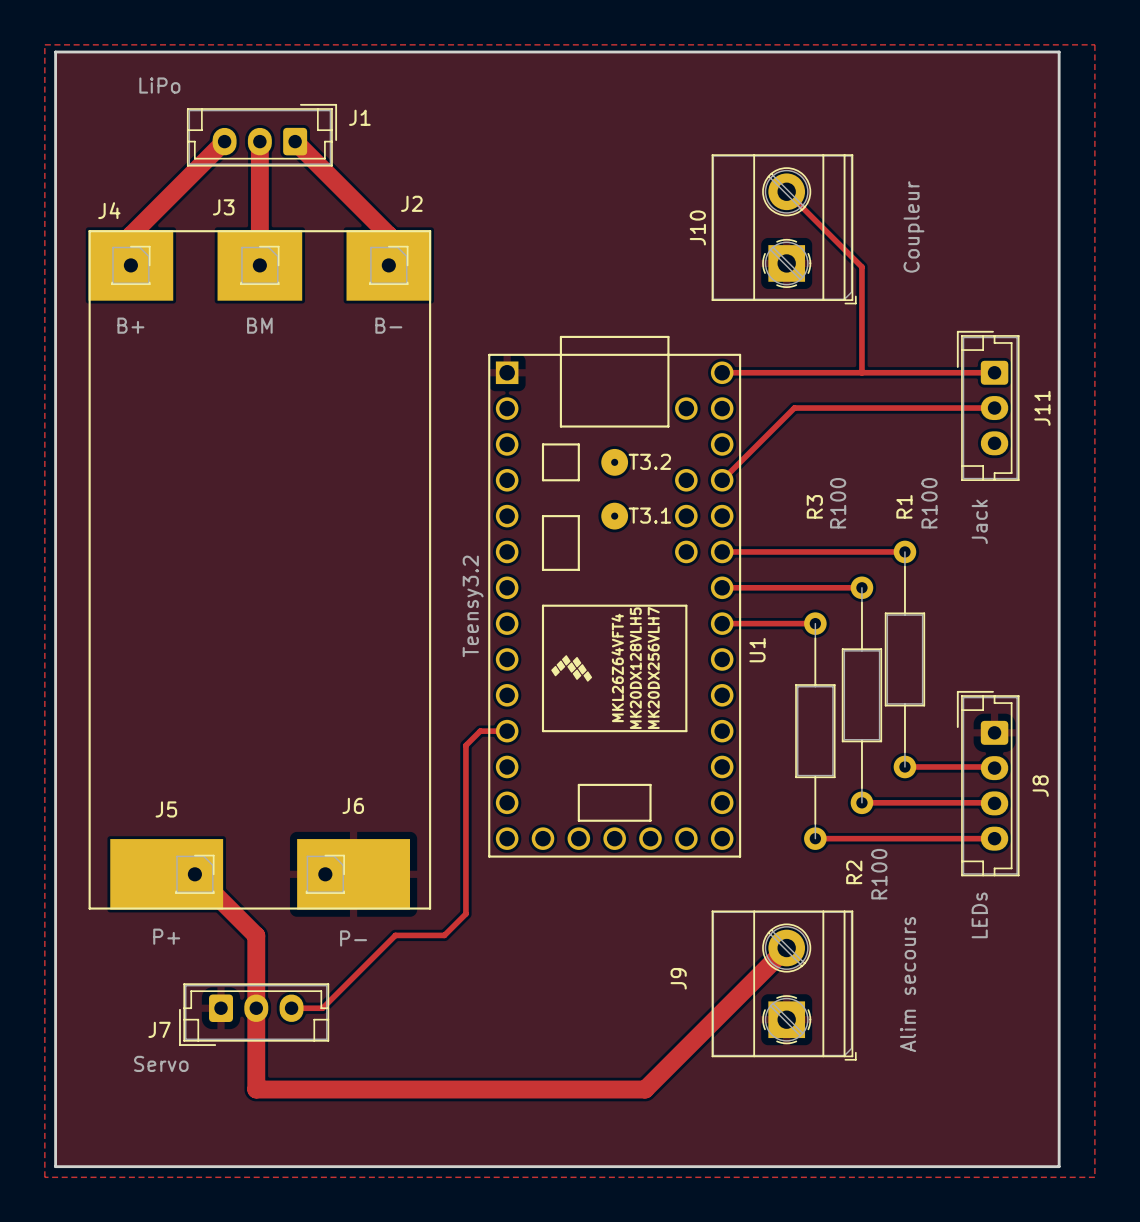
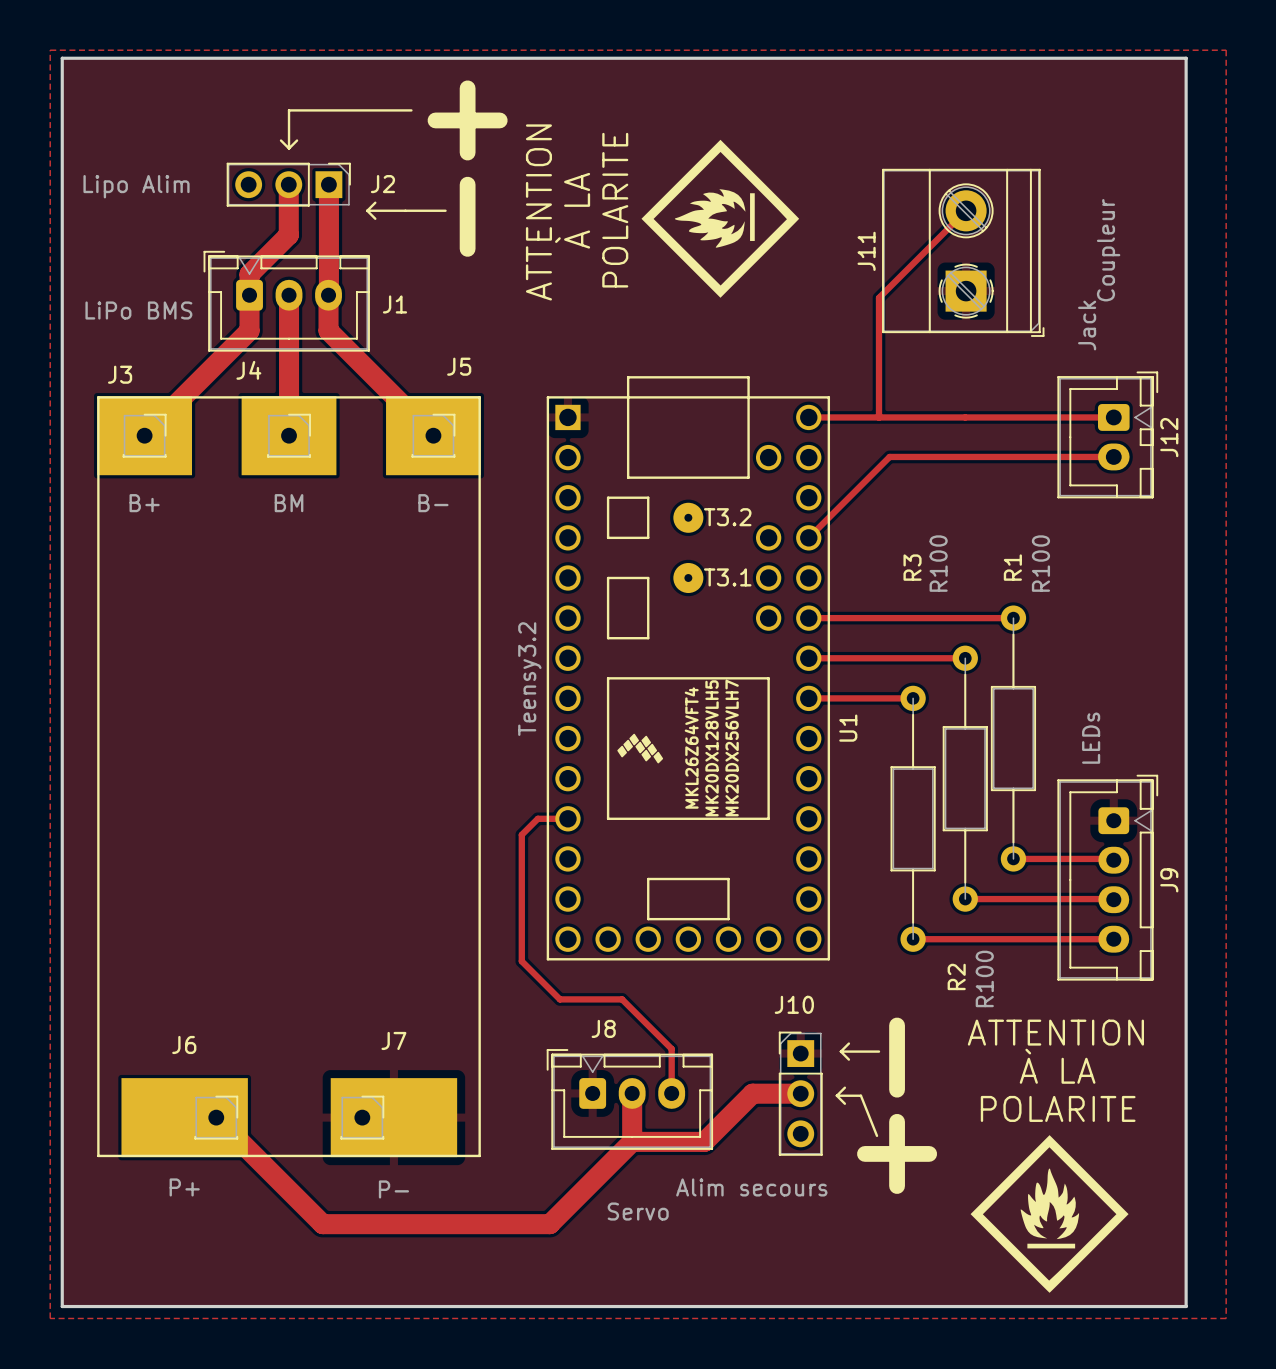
line: none -> (467, 88) (467, 152)
J1 value: LiPo (159, 85) -> LiPo BMS (138, 310)
line: none -> (411, 110) (289, 110) (289, 148)
J1 footprint: [186, 103, 338, 167] -> [203, 250, 370, 352]
line: none -> (435, 120) (499, 120)
drawing: none -> [641, 139, 800, 298]
line: none -> (280, 140) (289, 148)
line: none -> (297, 140) (289, 148)
track: (224, 141) (130, 235) (130, 265) -> none
track: (259, 141) (259, 265) -> none
track: (295, 141) (388, 235) (388, 265) -> none
J10 footprint: [711, 154, 857, 305] -> [778, 1031, 823, 1156]
track: none -> (288, 184) (288, 235) (249, 274) (249, 330) (144, 435)
track: none -> (328, 184) (328, 330) (433, 435)
line: none -> (467, 184) (467, 248)
line: none -> (375, 202) (367, 210)
text: none -> POLARITE (615, 210)
line: none -> (367, 210) (445, 210)
line: none -> (367, 210) (375, 218)
text: none -> À LA (572, 210)
track: none -> (966, 210) (879, 297) (879, 417)
text: none -> ATTENTION (538, 212)
track: (786, 191) (861, 267) (861, 372) -> none
J2 name position: J2 (411, 203) -> J2 (382, 184)
J3 name position: J3 (223, 207) -> J3 (120, 374)
J4 name position: J4 (109, 210) -> J4 (248, 370)
J10 value: Coupleur (913, 226) -> Alim secours (751, 1187)
J10 name position: J10 (697, 227) -> J10 (794, 1004)
J2 footprint: [346, 230, 432, 301] -> [226, 162, 351, 207]
line: (89, 231) (430, 231) (430, 908) (89, 908) (89, 231) -> (98, 397) (479, 397) (479, 1155) (98, 1155) (98, 397)
track: none -> (289, 295) (289, 435)
J4 position: (130, 265) -> (289, 435)
J3 position: (259, 265) -> (144, 435)
J4 value: B+ (130, 325) -> BM (289, 503)
J3 value: BM (259, 325) -> B+ (144, 503)
J2 value: B- (388, 325) -> Lipo Alim (136, 186)
J11 footprint: [956, 330, 1020, 481] -> [882, 168, 1045, 337]
J12: none -> Jack (1107, 434)
J11 name position: J11 (1042, 408) -> J11 (866, 251)
J11 value: Jack (979, 521) -> Coupleur (1108, 250)
J8 footprint: [956, 690, 1020, 877] -> [546, 1049, 714, 1150]
J8 name position: J8 (1040, 786) -> J8 (603, 1028)
J5 footprint: [110, 839, 224, 910] -> [386, 396, 481, 476]
J6 footprint: [297, 839, 410, 910] -> [121, 1078, 248, 1158]
track: (465, 858) (465, 913) (444, 935) (395, 935) (322, 1008) (291, 1008) -> (521, 961) (559, 999) (622, 999) (671, 1048) (671, 1093)
track: (194, 874) (256, 935) (256, 1089) (645, 1089) (786, 948) -> none
J9 footprint: [711, 910, 857, 1061] -> [1057, 774, 1159, 981]
line: none -> (897, 1025) (897, 1089)
J8 value: LEDs (979, 915) -> Servo (638, 1211)
text: none -> ATTENTION (1055, 1032)
line: none -> (848, 1043) (840, 1051)
J5 value: P+ (166, 936) -> B- (433, 503)
J6 value: P- (353, 938) -> P+ (184, 1187)
line: none -> (840, 1051) (848, 1059)
line: none -> (840, 1051) (879, 1051)
text: none -> À LA (1057, 1066)
line: none -> (844, 1087) (836, 1095)
track: none -> (632, 1093) (632, 1141)
track: none -> (800, 1093) (752, 1093) (704, 1141) (632, 1141)
J9 name position: J9 (678, 978) -> J9 (1169, 880)
line: none -> (836, 1095) (844, 1103)
line: none -> (836, 1095) (860, 1095) (877, 1135)
J7 footprint: [179, 983, 330, 1046] -> [330, 1078, 458, 1158]
J9 value: Alim secours (908, 984) -> LEDs (1091, 738)
text: none -> POLARITE (1058, 1108)
track: none -> (216, 1117) (322, 1224) (549, 1224) (632, 1141)
line: none -> (897, 1121) (897, 1186)
drawing: none -> [970, 1135, 1129, 1293]
J7 name position: J7 (159, 1029) -> J7 (393, 1040)
line: none -> (864, 1153) (929, 1153)
J7 value: Servo (161, 1063) -> P- (393, 1189)

